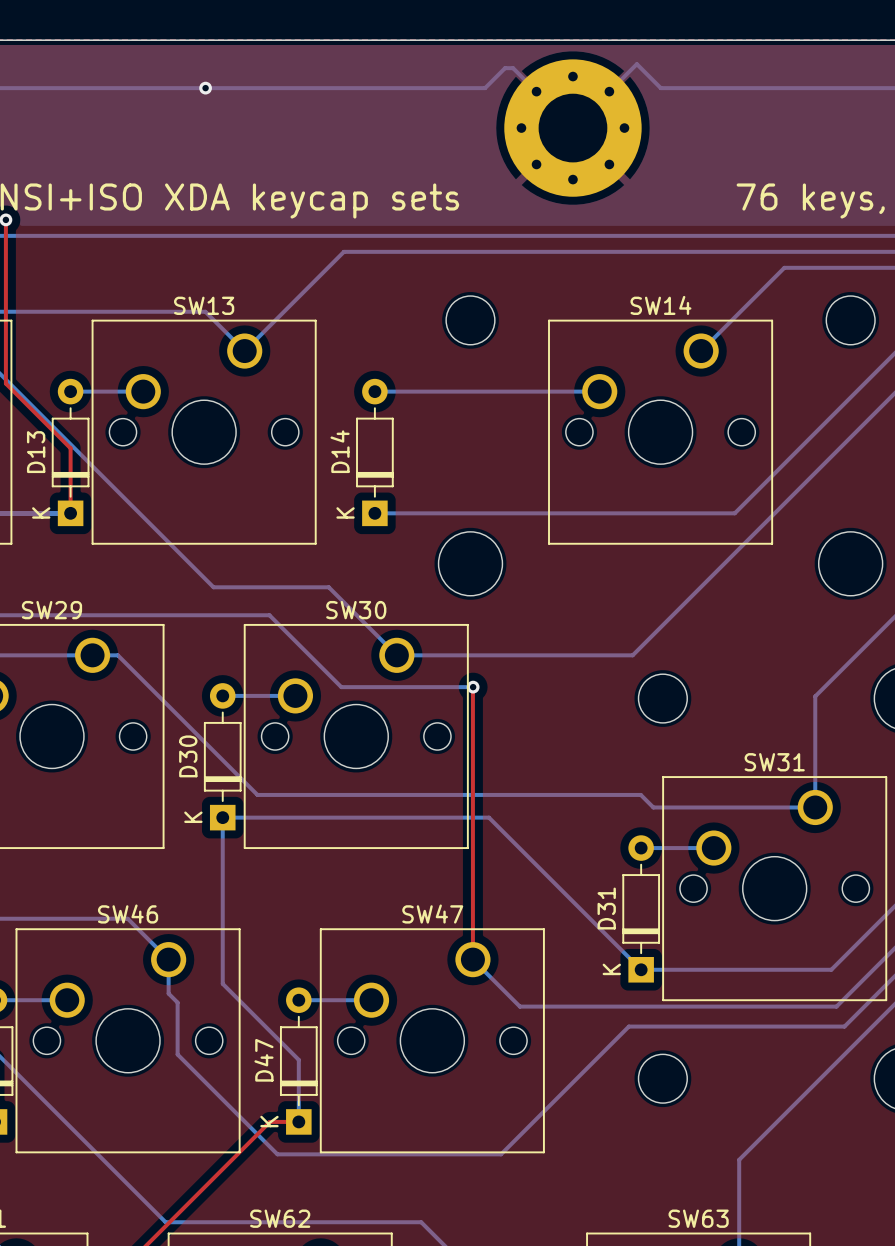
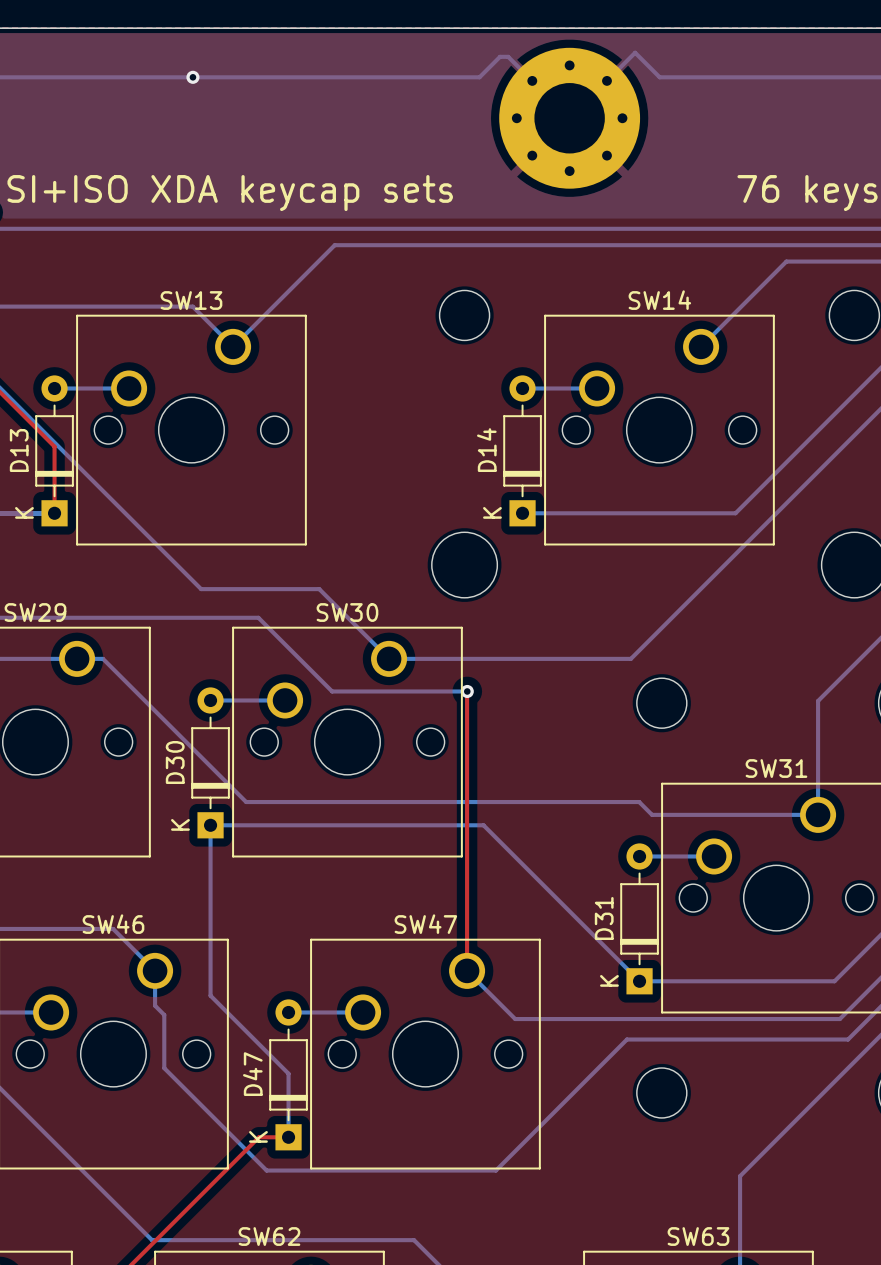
bottom track: (374, 391) (527, 391) -> none
D14 position: (374, 452) -> (522, 450)
bottom track: (374, 513) (527, 513) -> none

